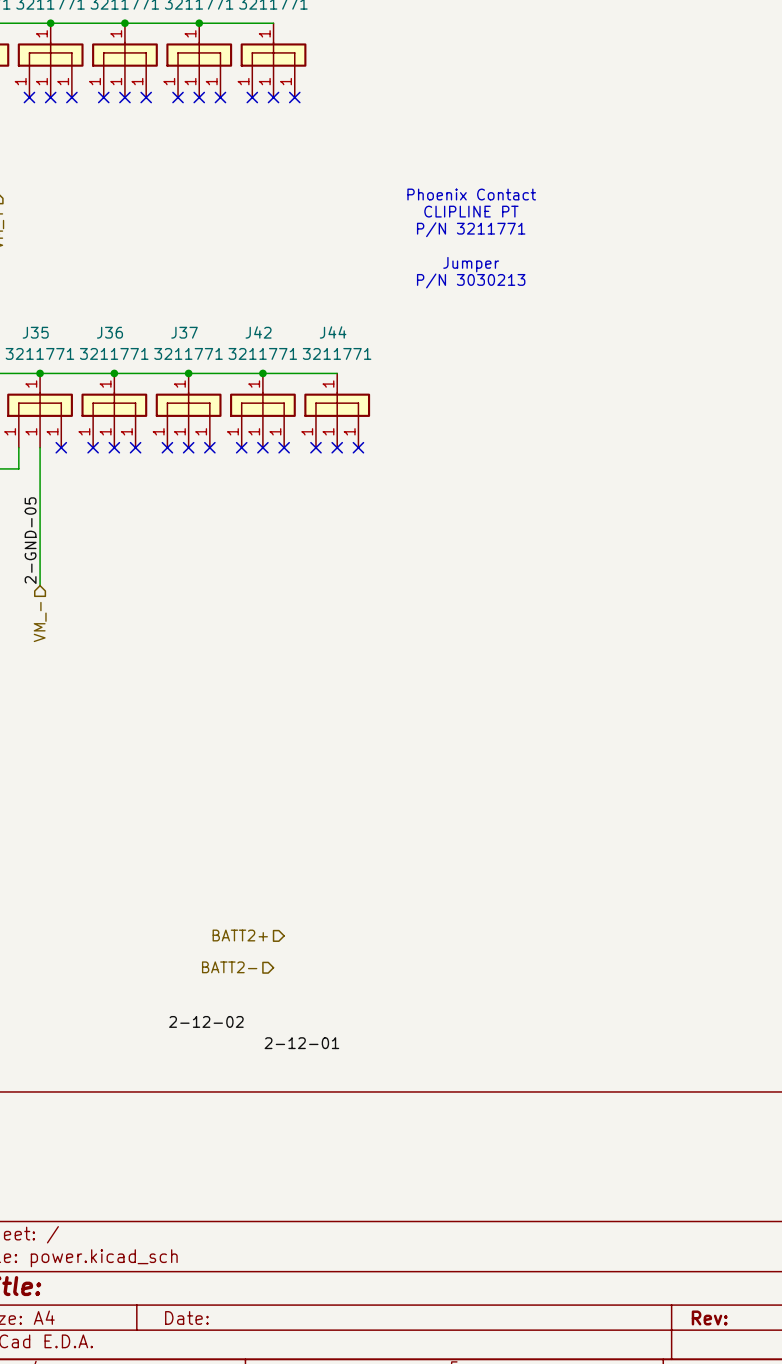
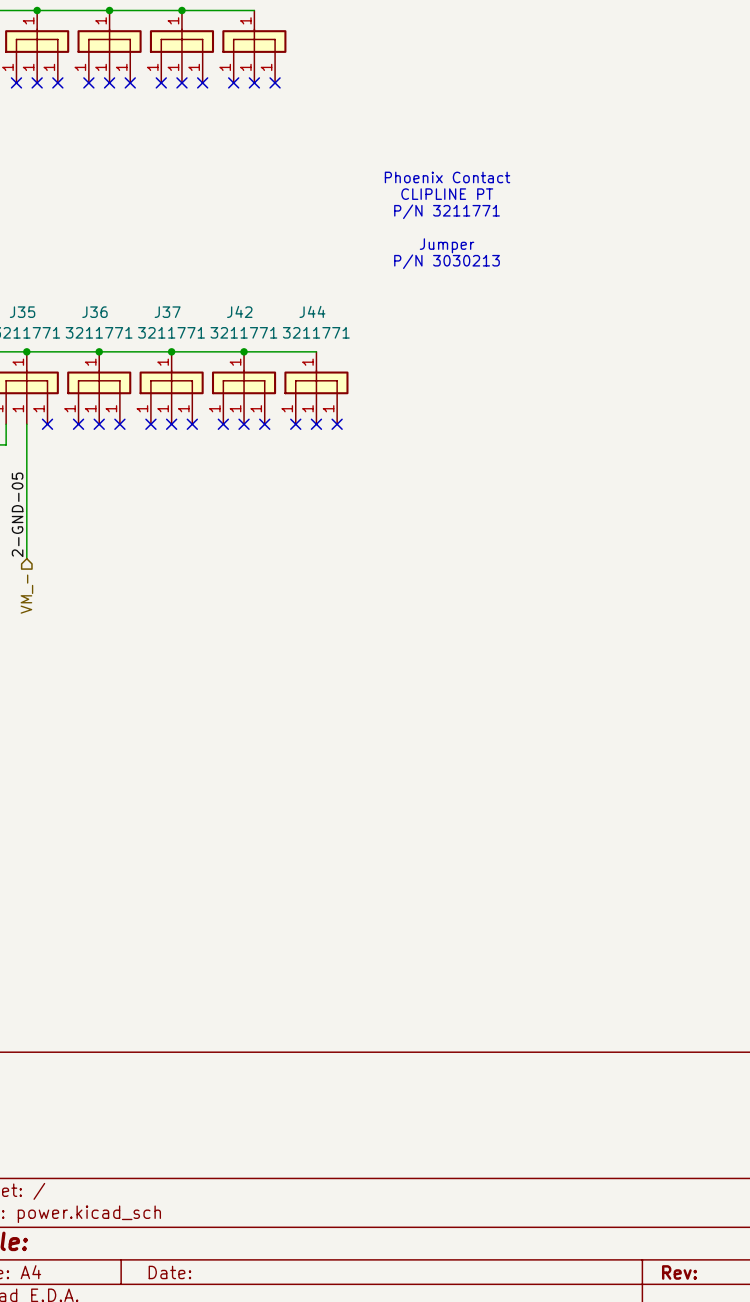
hierarchical label: BATT2+ (240, 935) -> none
hierarchical label: BATT2- (229, 967) -> none
label: 2-12-02 (206, 1021) -> none
label: 2-12-01 (301, 1043) -> none

